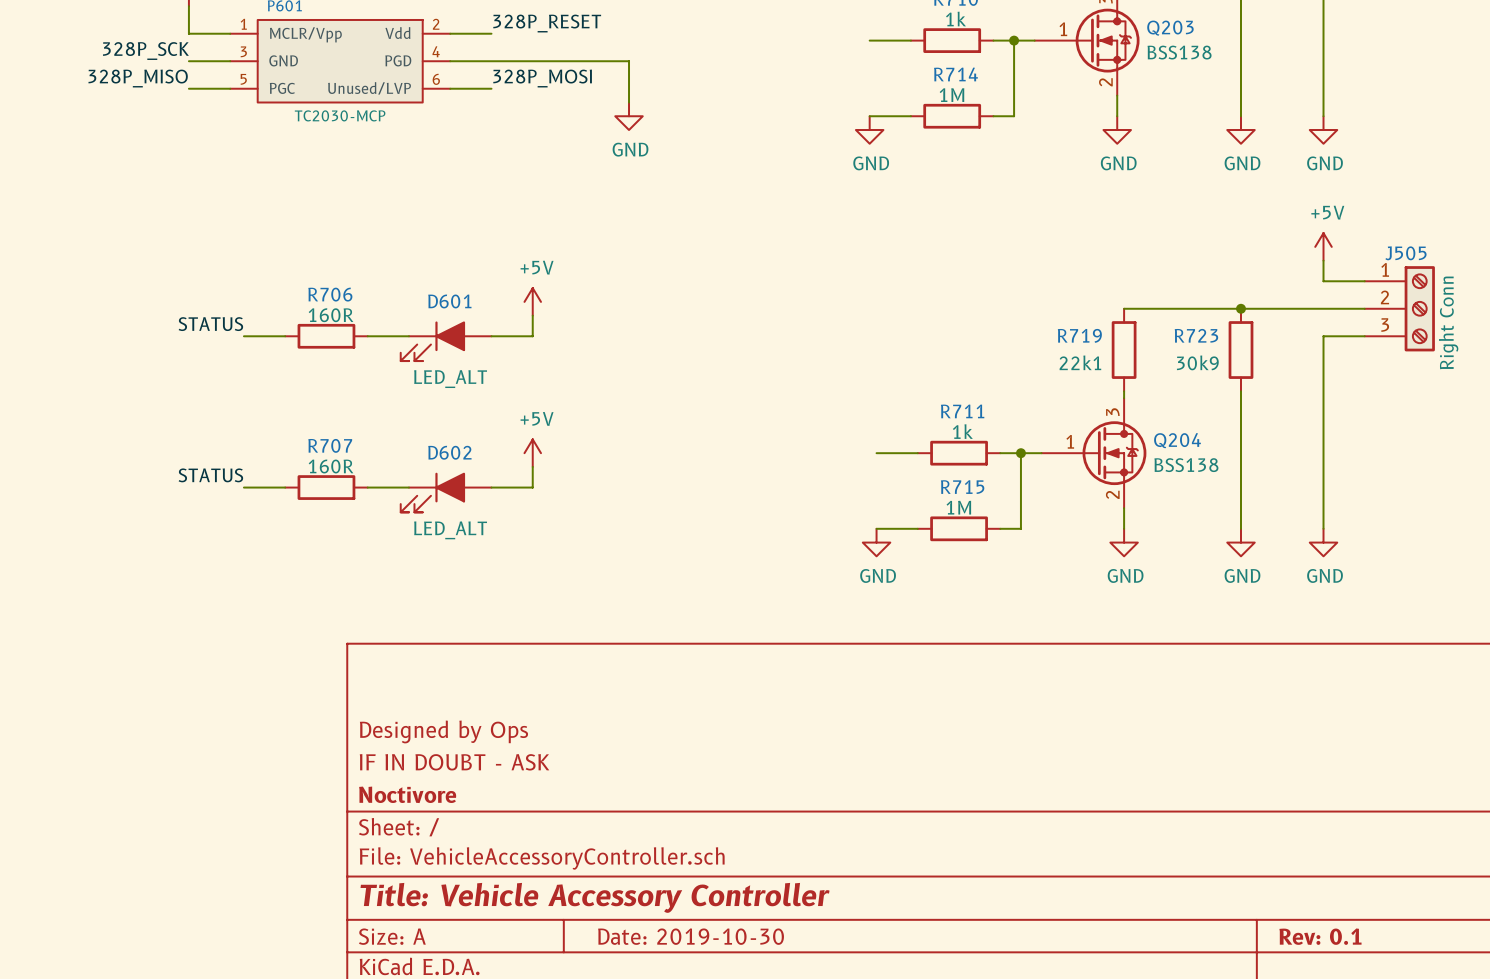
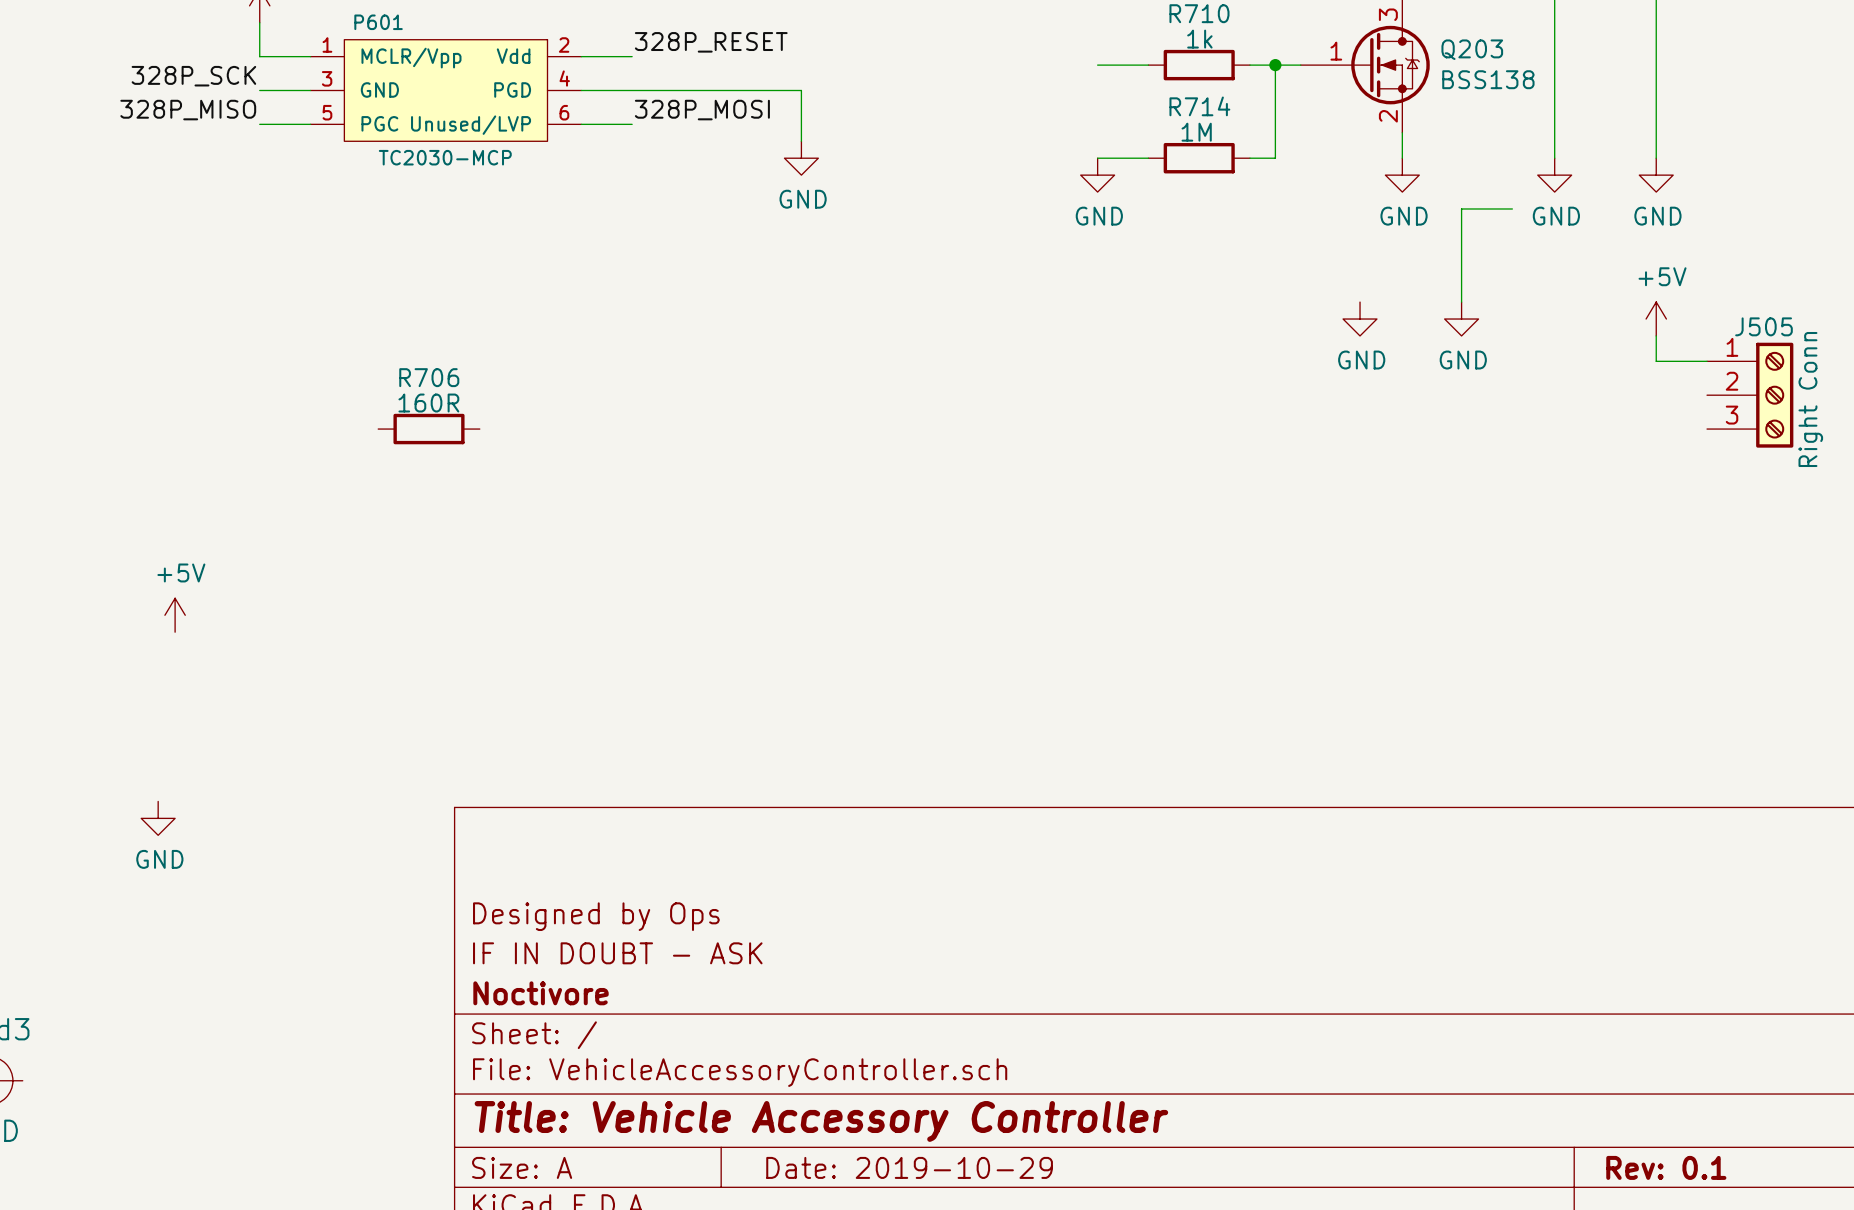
wire: none -> (1512, 208) (1461, 208) (1461, 302)
power symbol: none -> GND (1360, 319)
power symbol: none -> GND (1461, 319)
power symbol: +5V (532, 301) -> none
wire: (1124, 308) (1364, 308) -> none
junction: (1240, 308) -> none
wire: (532, 315) (532, 336) (491, 336) -> none
label: STATUS (210, 324) -> none
wire: (243, 336) (285, 336) -> none
wire: (367, 336) (408, 336) -> none
wire: (1364, 336) (1323, 336) (1323, 528) -> none
D601: LED_ALT (446, 341) -> none
R719: 22k1 (1124, 350) -> none
R723: 30k9 (1240, 350) -> none
wire: (1124, 391) (1124, 398) -> none
wire: (1240, 391) (1240, 528) -> none
power symbol: +5V (532, 453) -> none
wire: (876, 453) (917, 453) -> none
R711: 1k (959, 453) -> none
wire: (1000, 453) (1041, 453) -> none
wire: (1020, 453) (1020, 528) (1000, 528) -> none
junction: (1020, 453) -> none
Q204: BSS138 (1093, 453) -> none
wire: (532, 466) (532, 487) (491, 487) -> none
label: STATUS (210, 475) -> none
power symbol: none -> +5V (175, 615)
wire: (243, 487) (285, 487) -> none
R707: 160R (326, 487) -> none
wire: (367, 487) (408, 487) -> none
D602: LED_ALT (446, 492) -> none
wire: (1124, 508) (1124, 528) -> none
wire: (876, 528) (917, 528) -> none
R715: 1M (959, 528) -> none
power symbol: GND (876, 542) -> none
power symbol: GND (1124, 542) -> none
power symbol: GND (1240, 542) -> none
power symbol: GND (1323, 542) -> none
power symbol: none -> GND (158, 818)
title block: Date: 2019-10-30 (691, 936) -> Date: 2019-10-29 (909, 1167)

